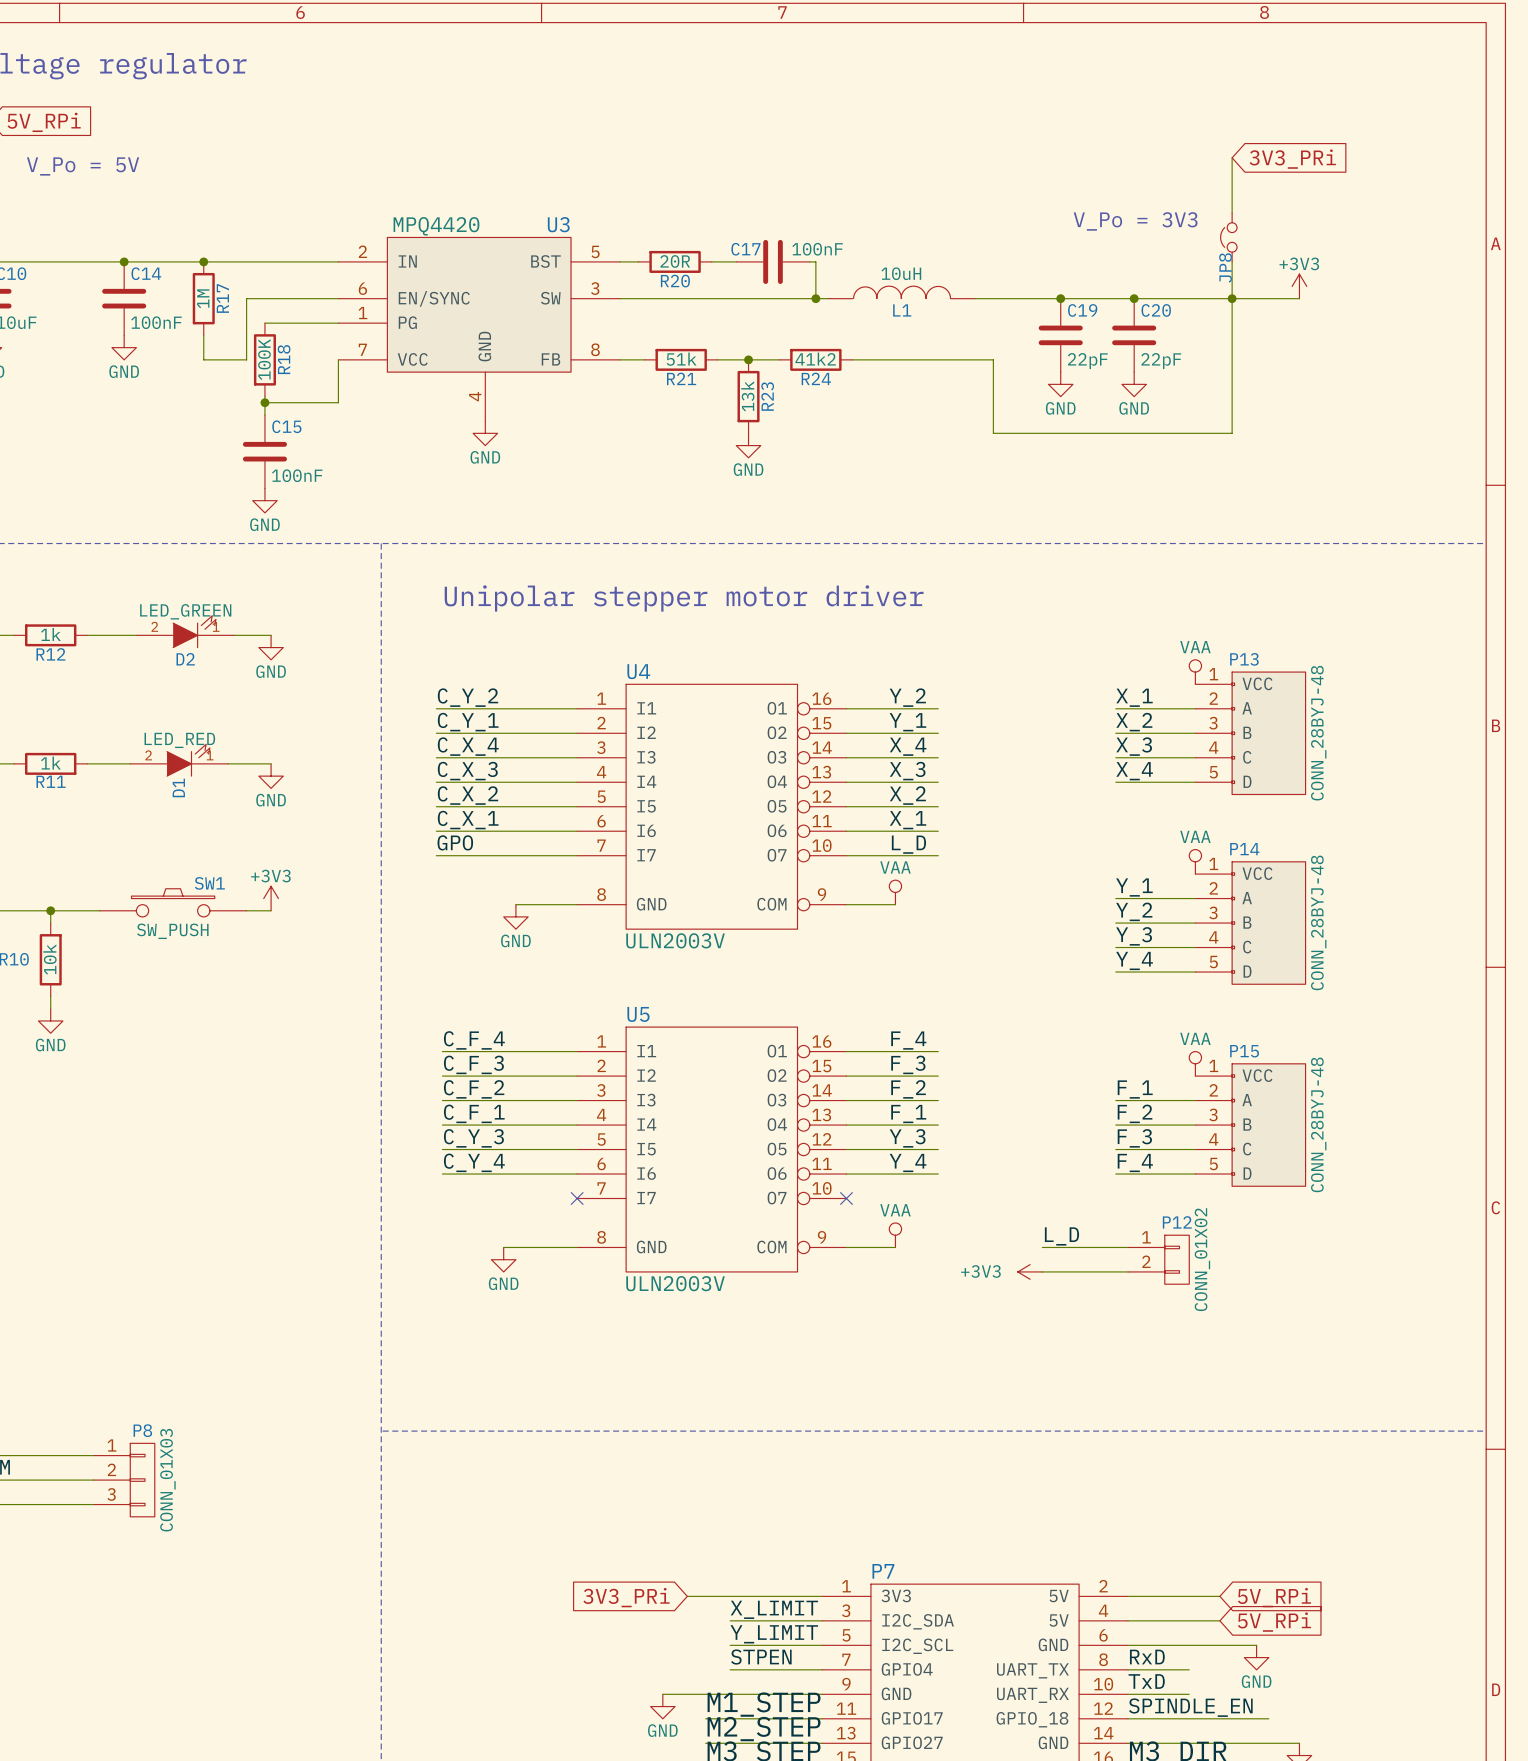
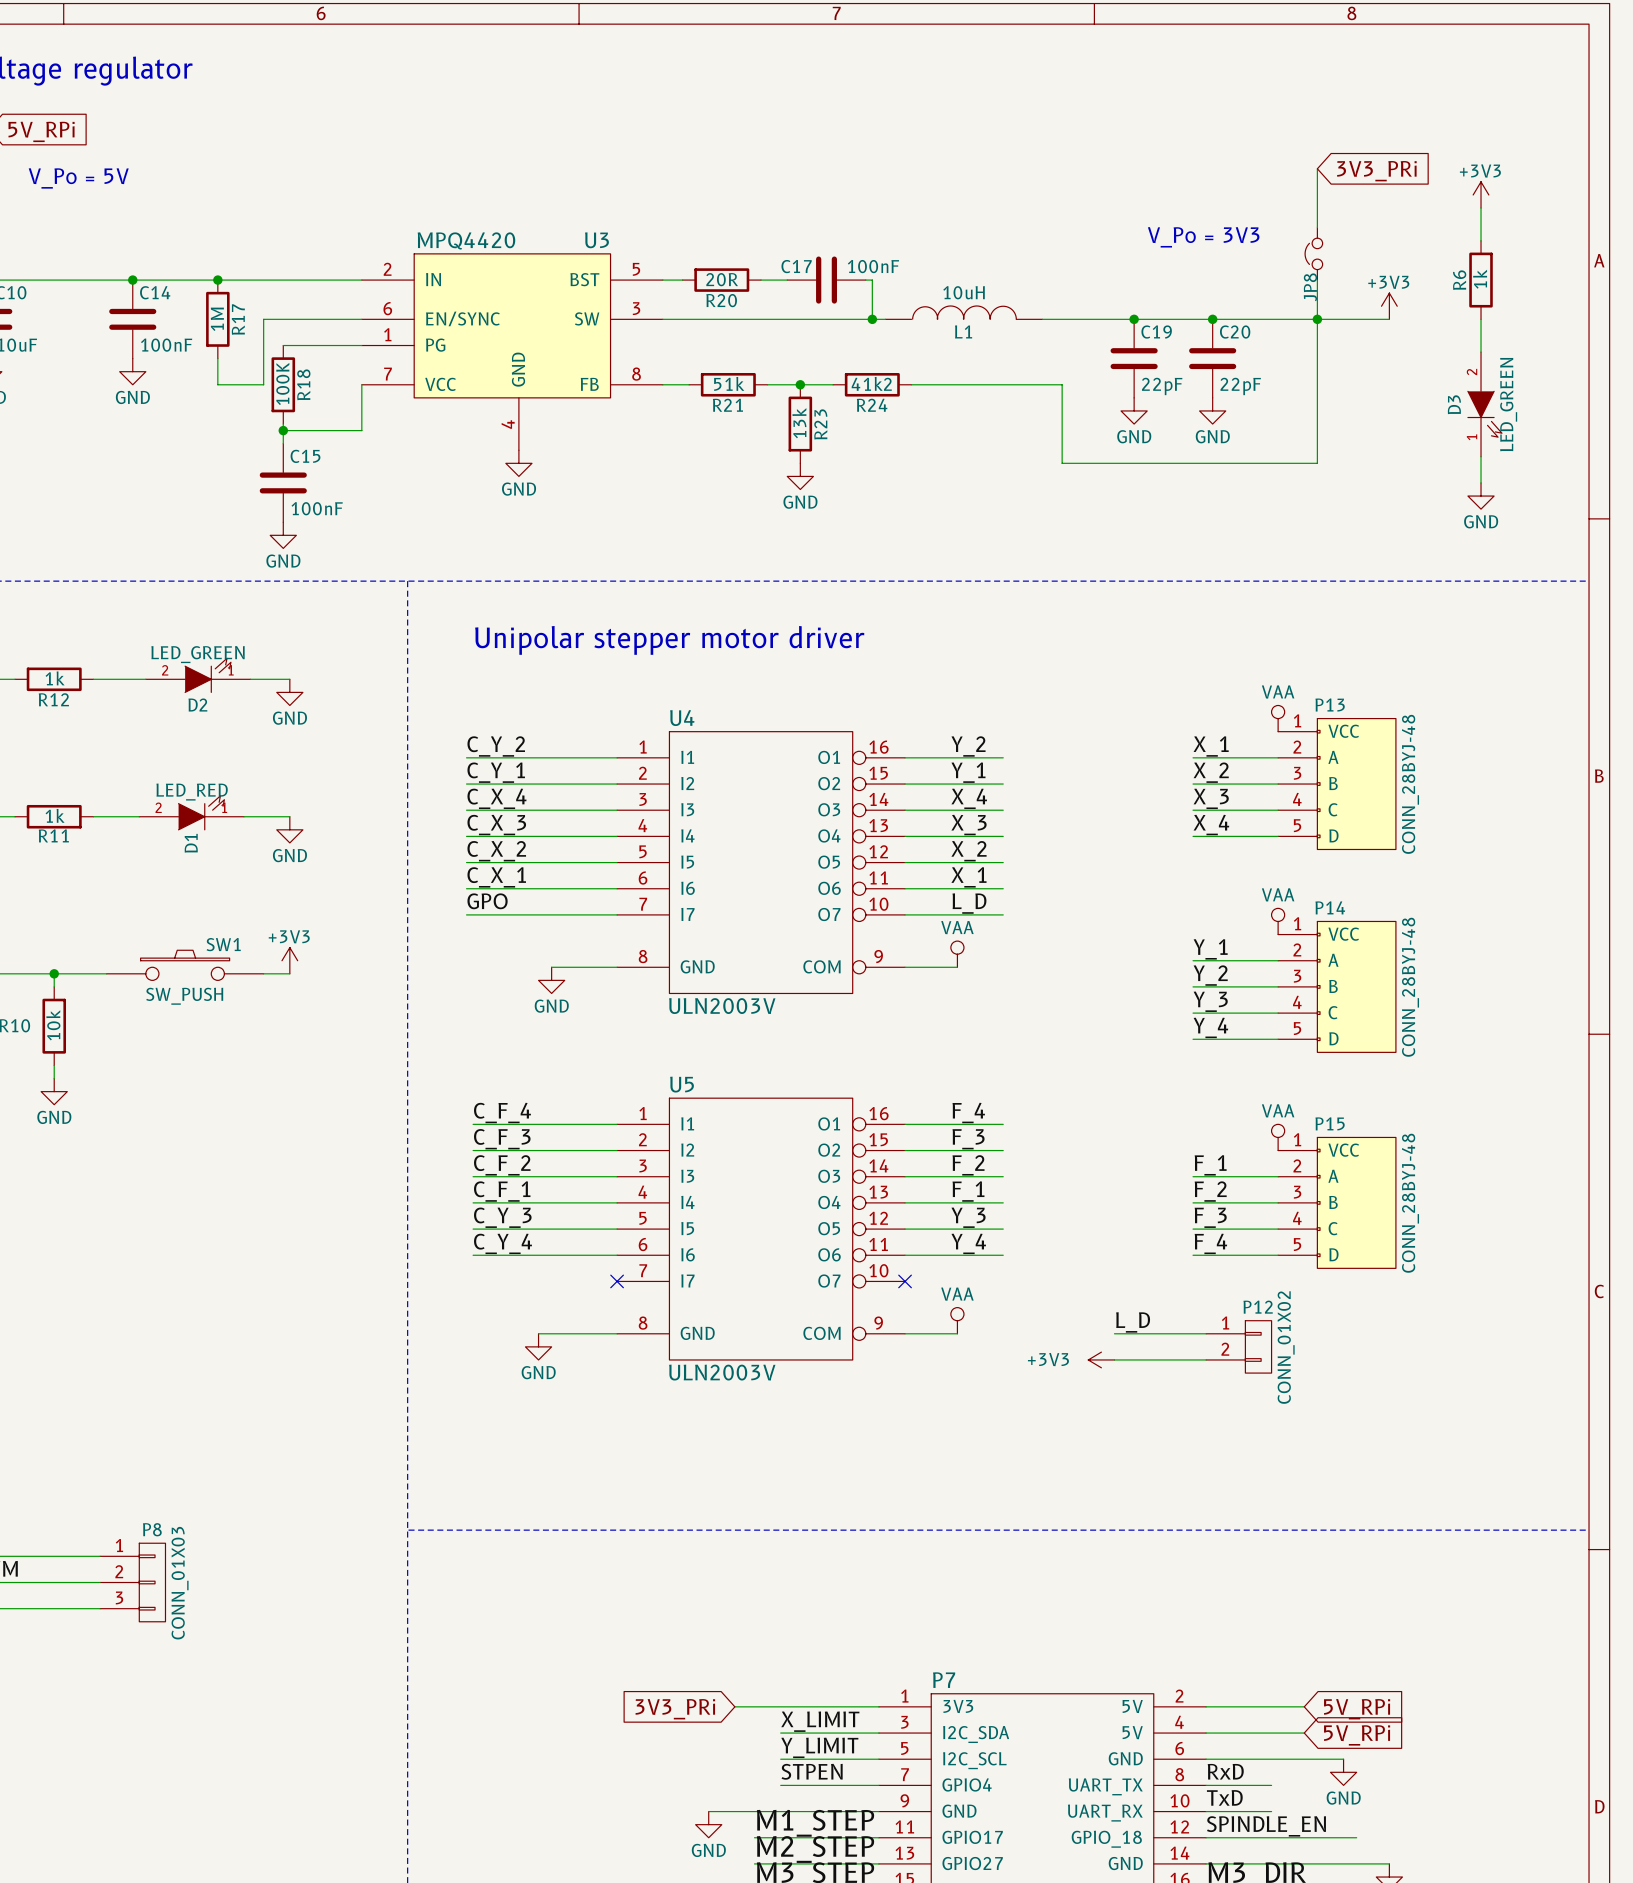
power symbol: none -> +3V3 (1481, 194)
wire: none -> (1481, 208) (1481, 240)
R6: none -> 1k (1481, 280)
wire: none -> (1481, 319) (1481, 352)
D3: none -> LED_GREEN (1484, 404)
wire: none -> (1481, 456) (1481, 482)
power symbol: none -> GND (1481, 496)

